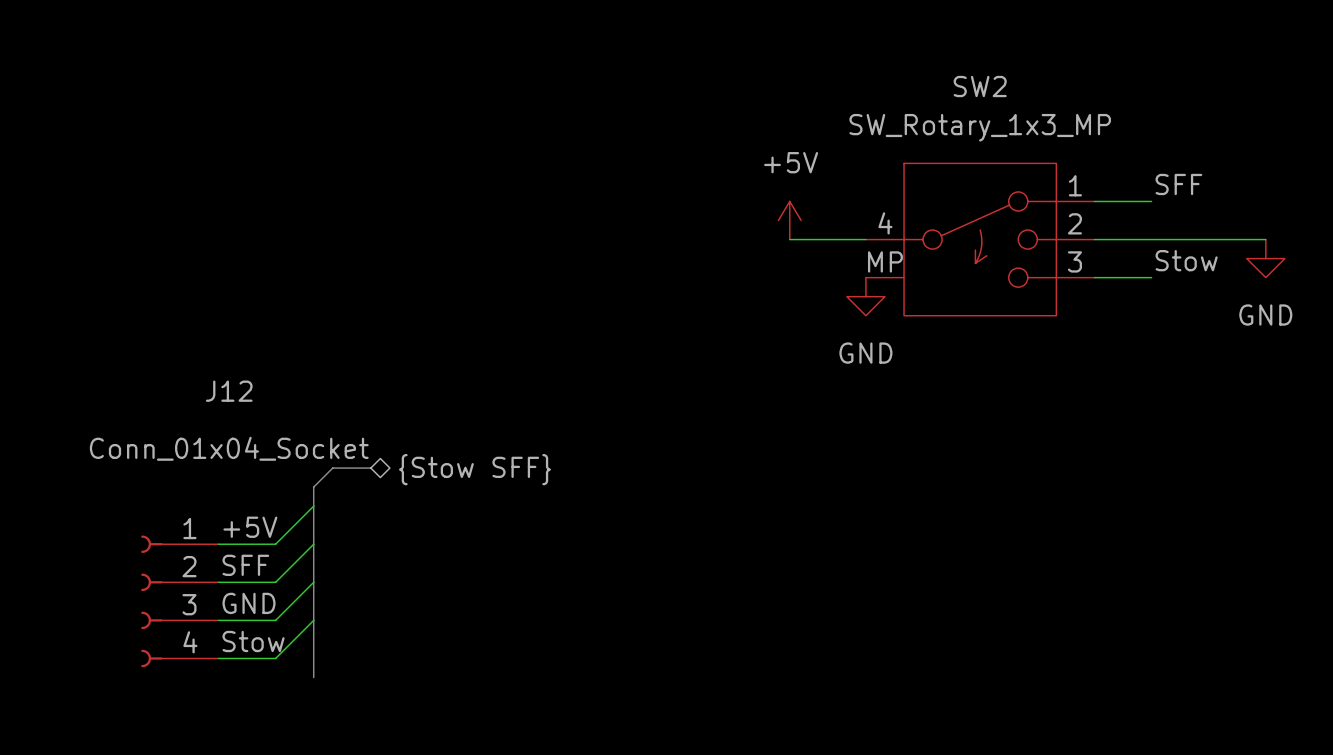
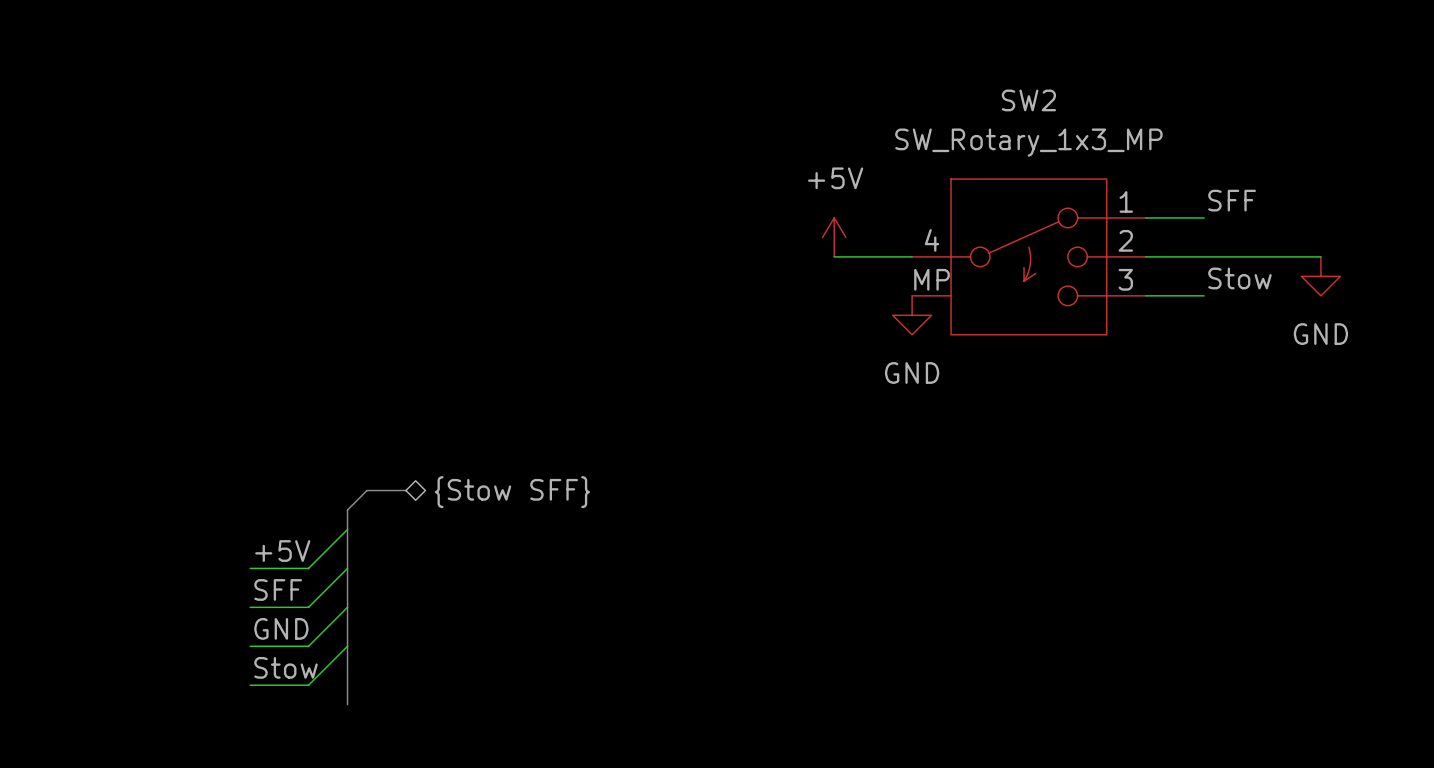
J12: Conn_01x04_Socket (179, 601) -> none

